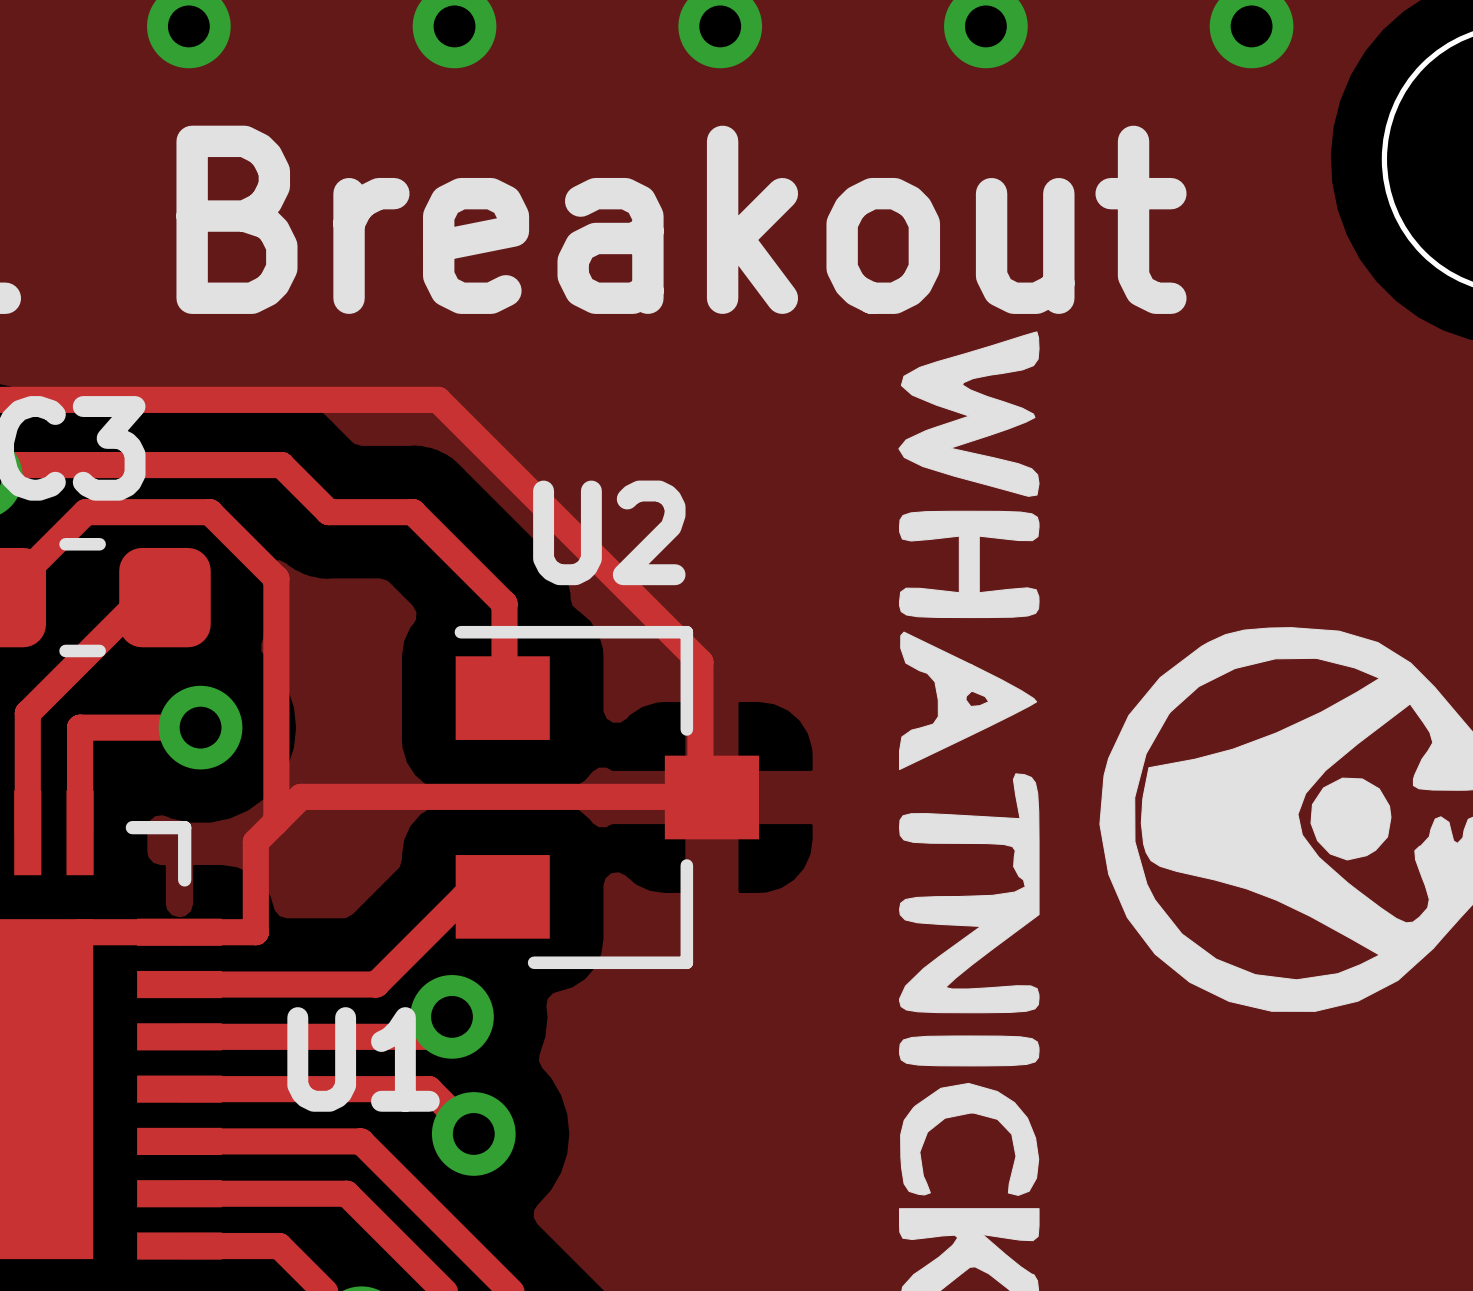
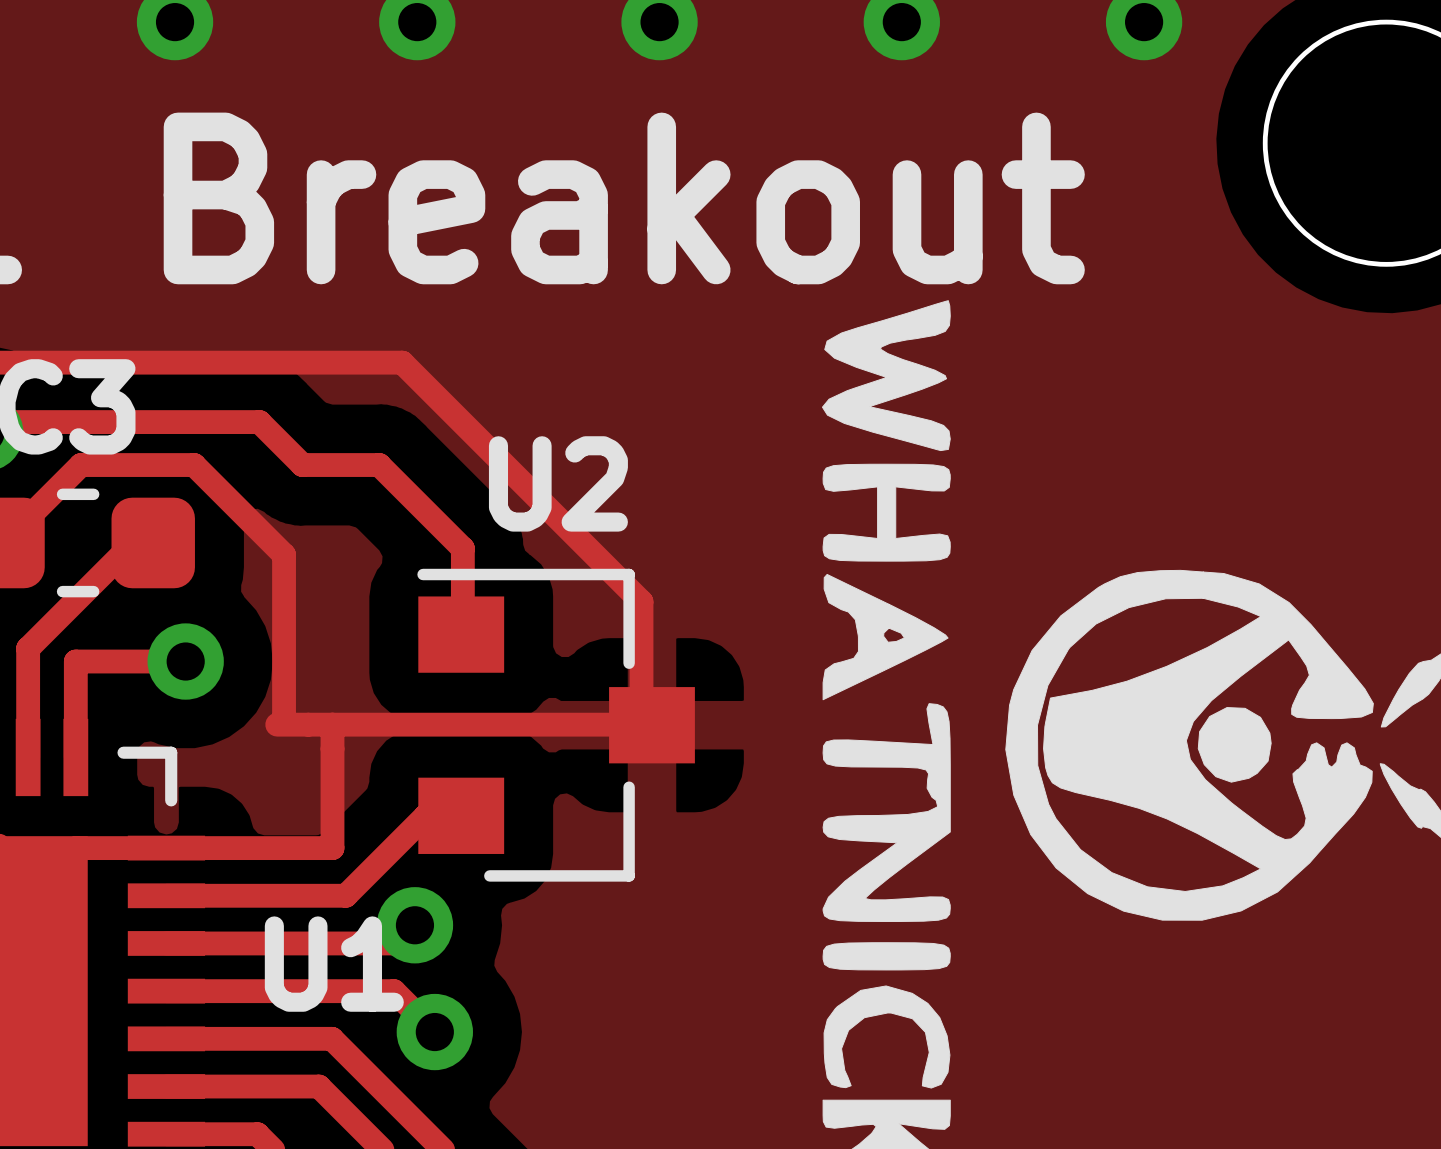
track: (276, 578) (276, 821) -> (254, 525) (284, 554) (284, 717)
track: (300, 796) (255, 841) (255, 932) -> (332, 724) (332, 848) (236, 848)

